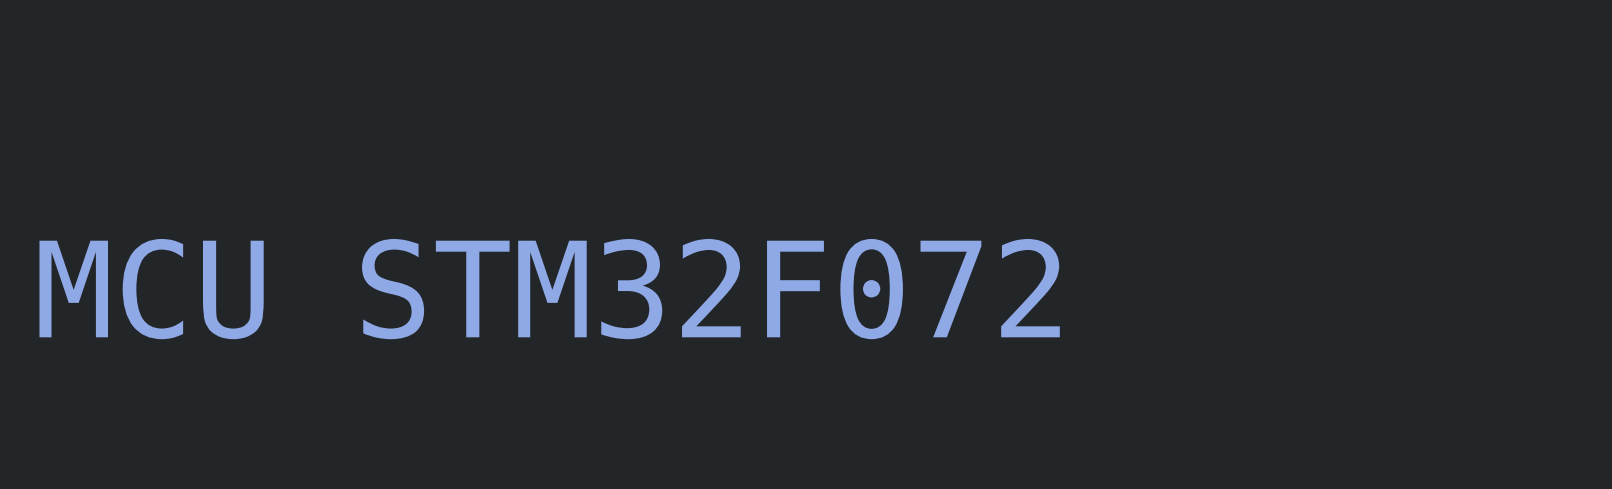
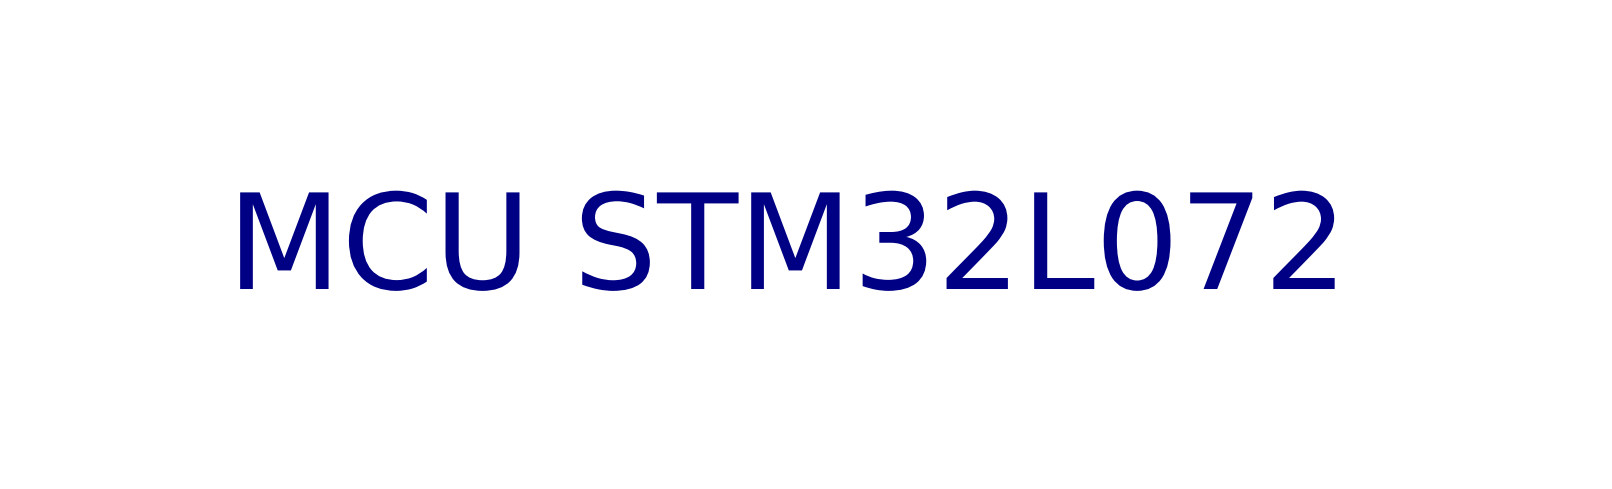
text: MCU STM32F072 (549, 289) -> MCU STM32L072 (787, 240)

